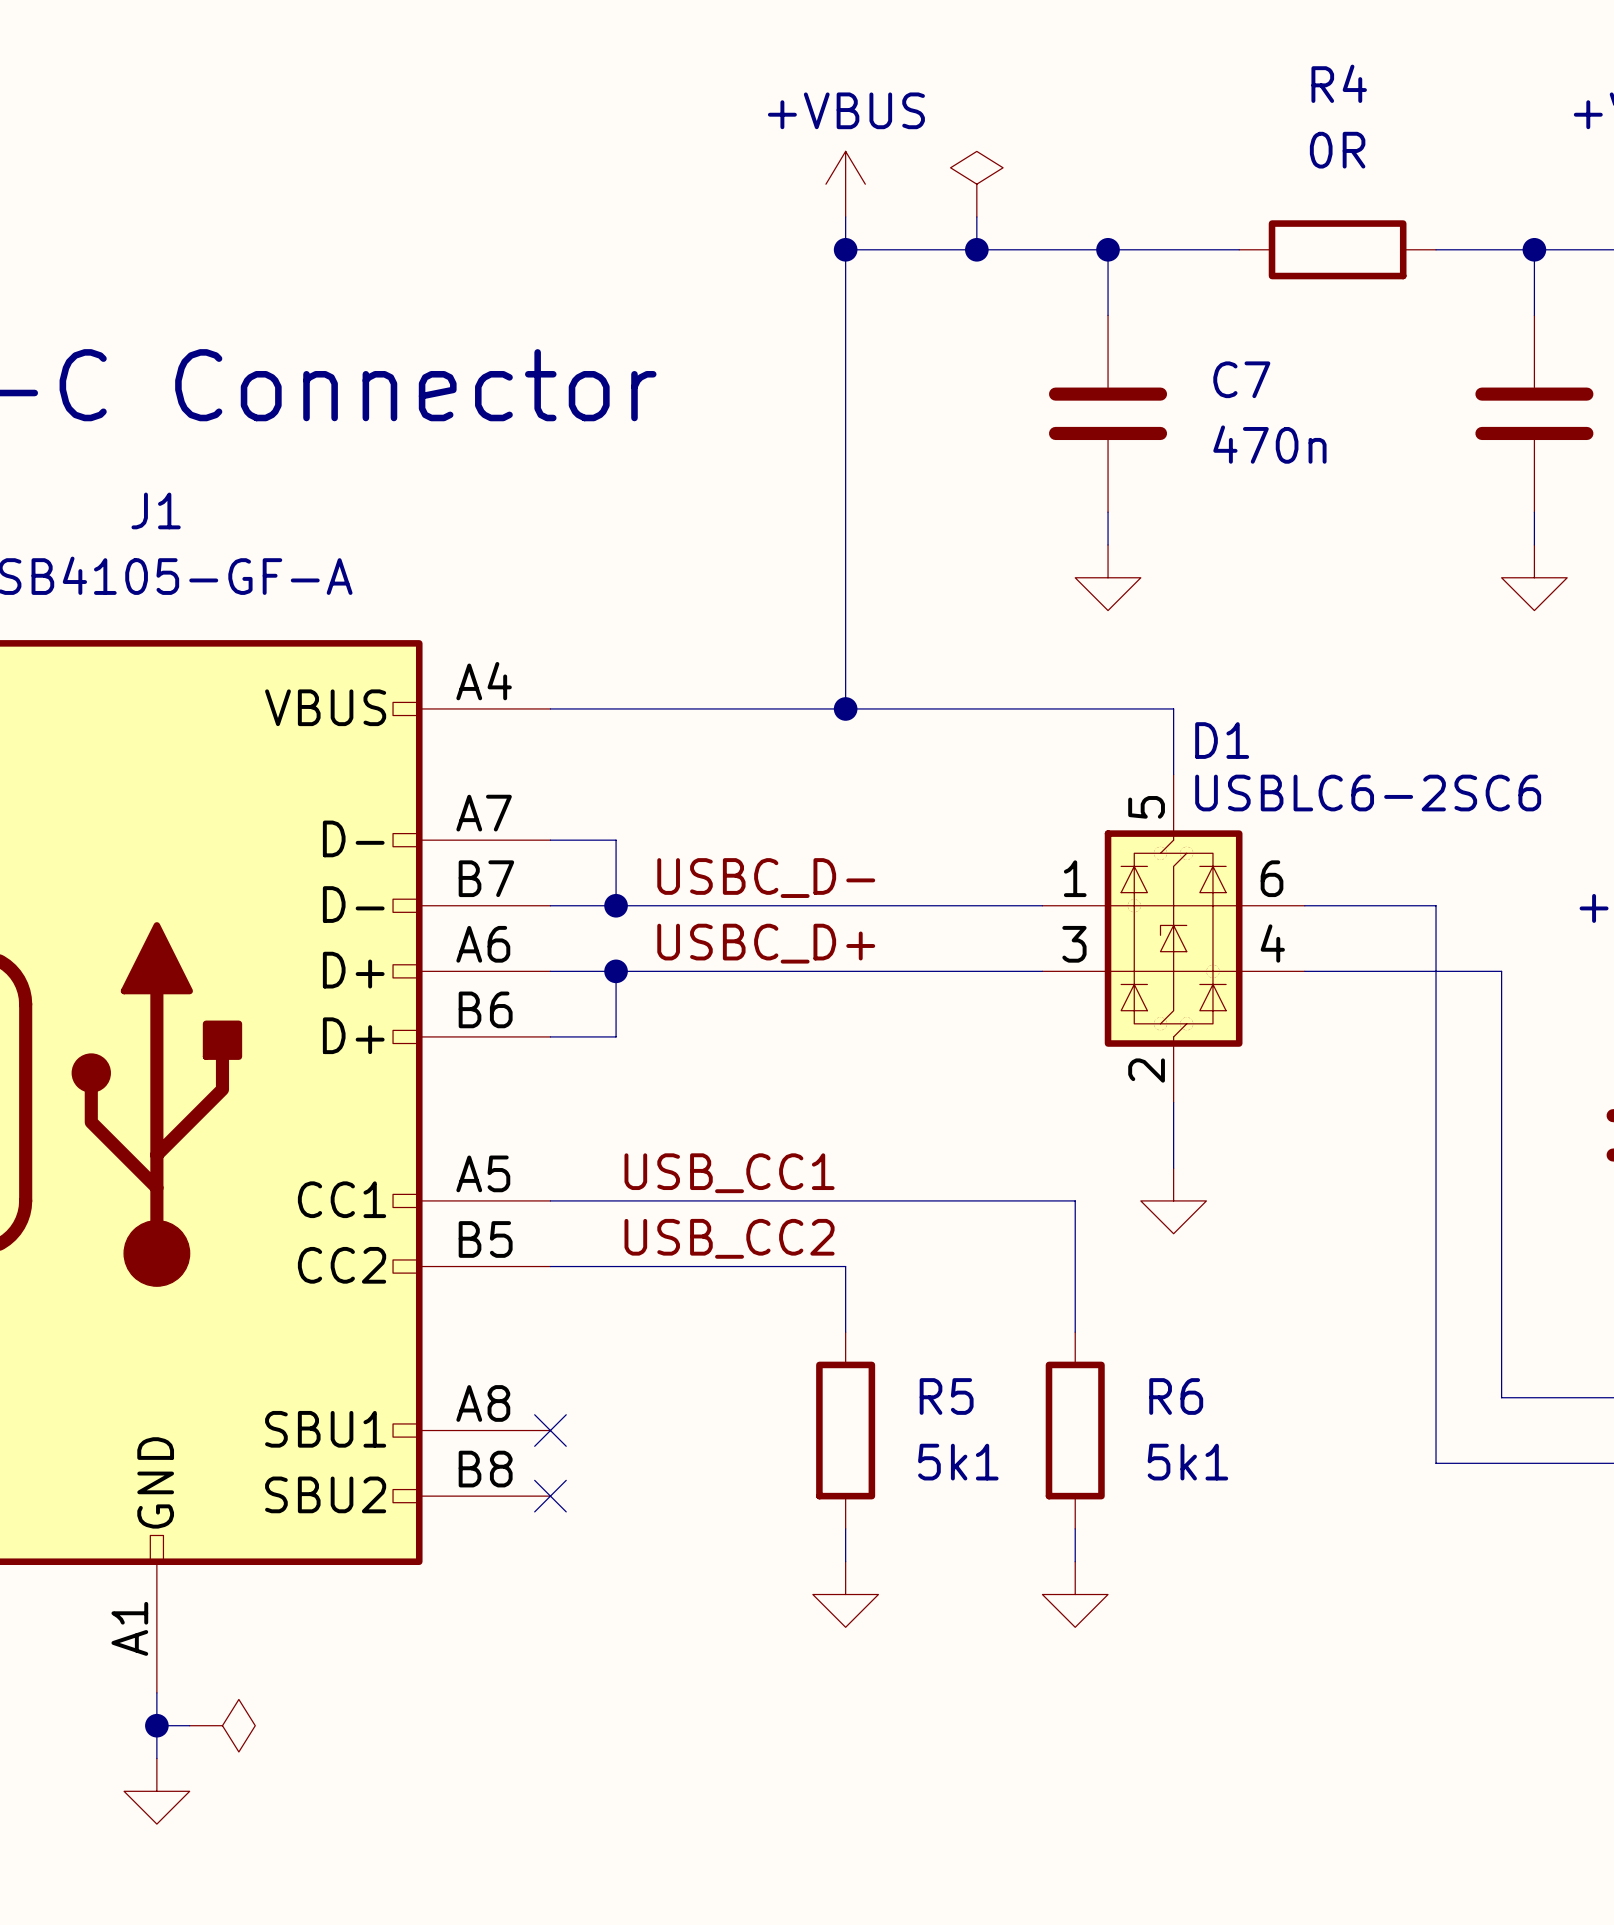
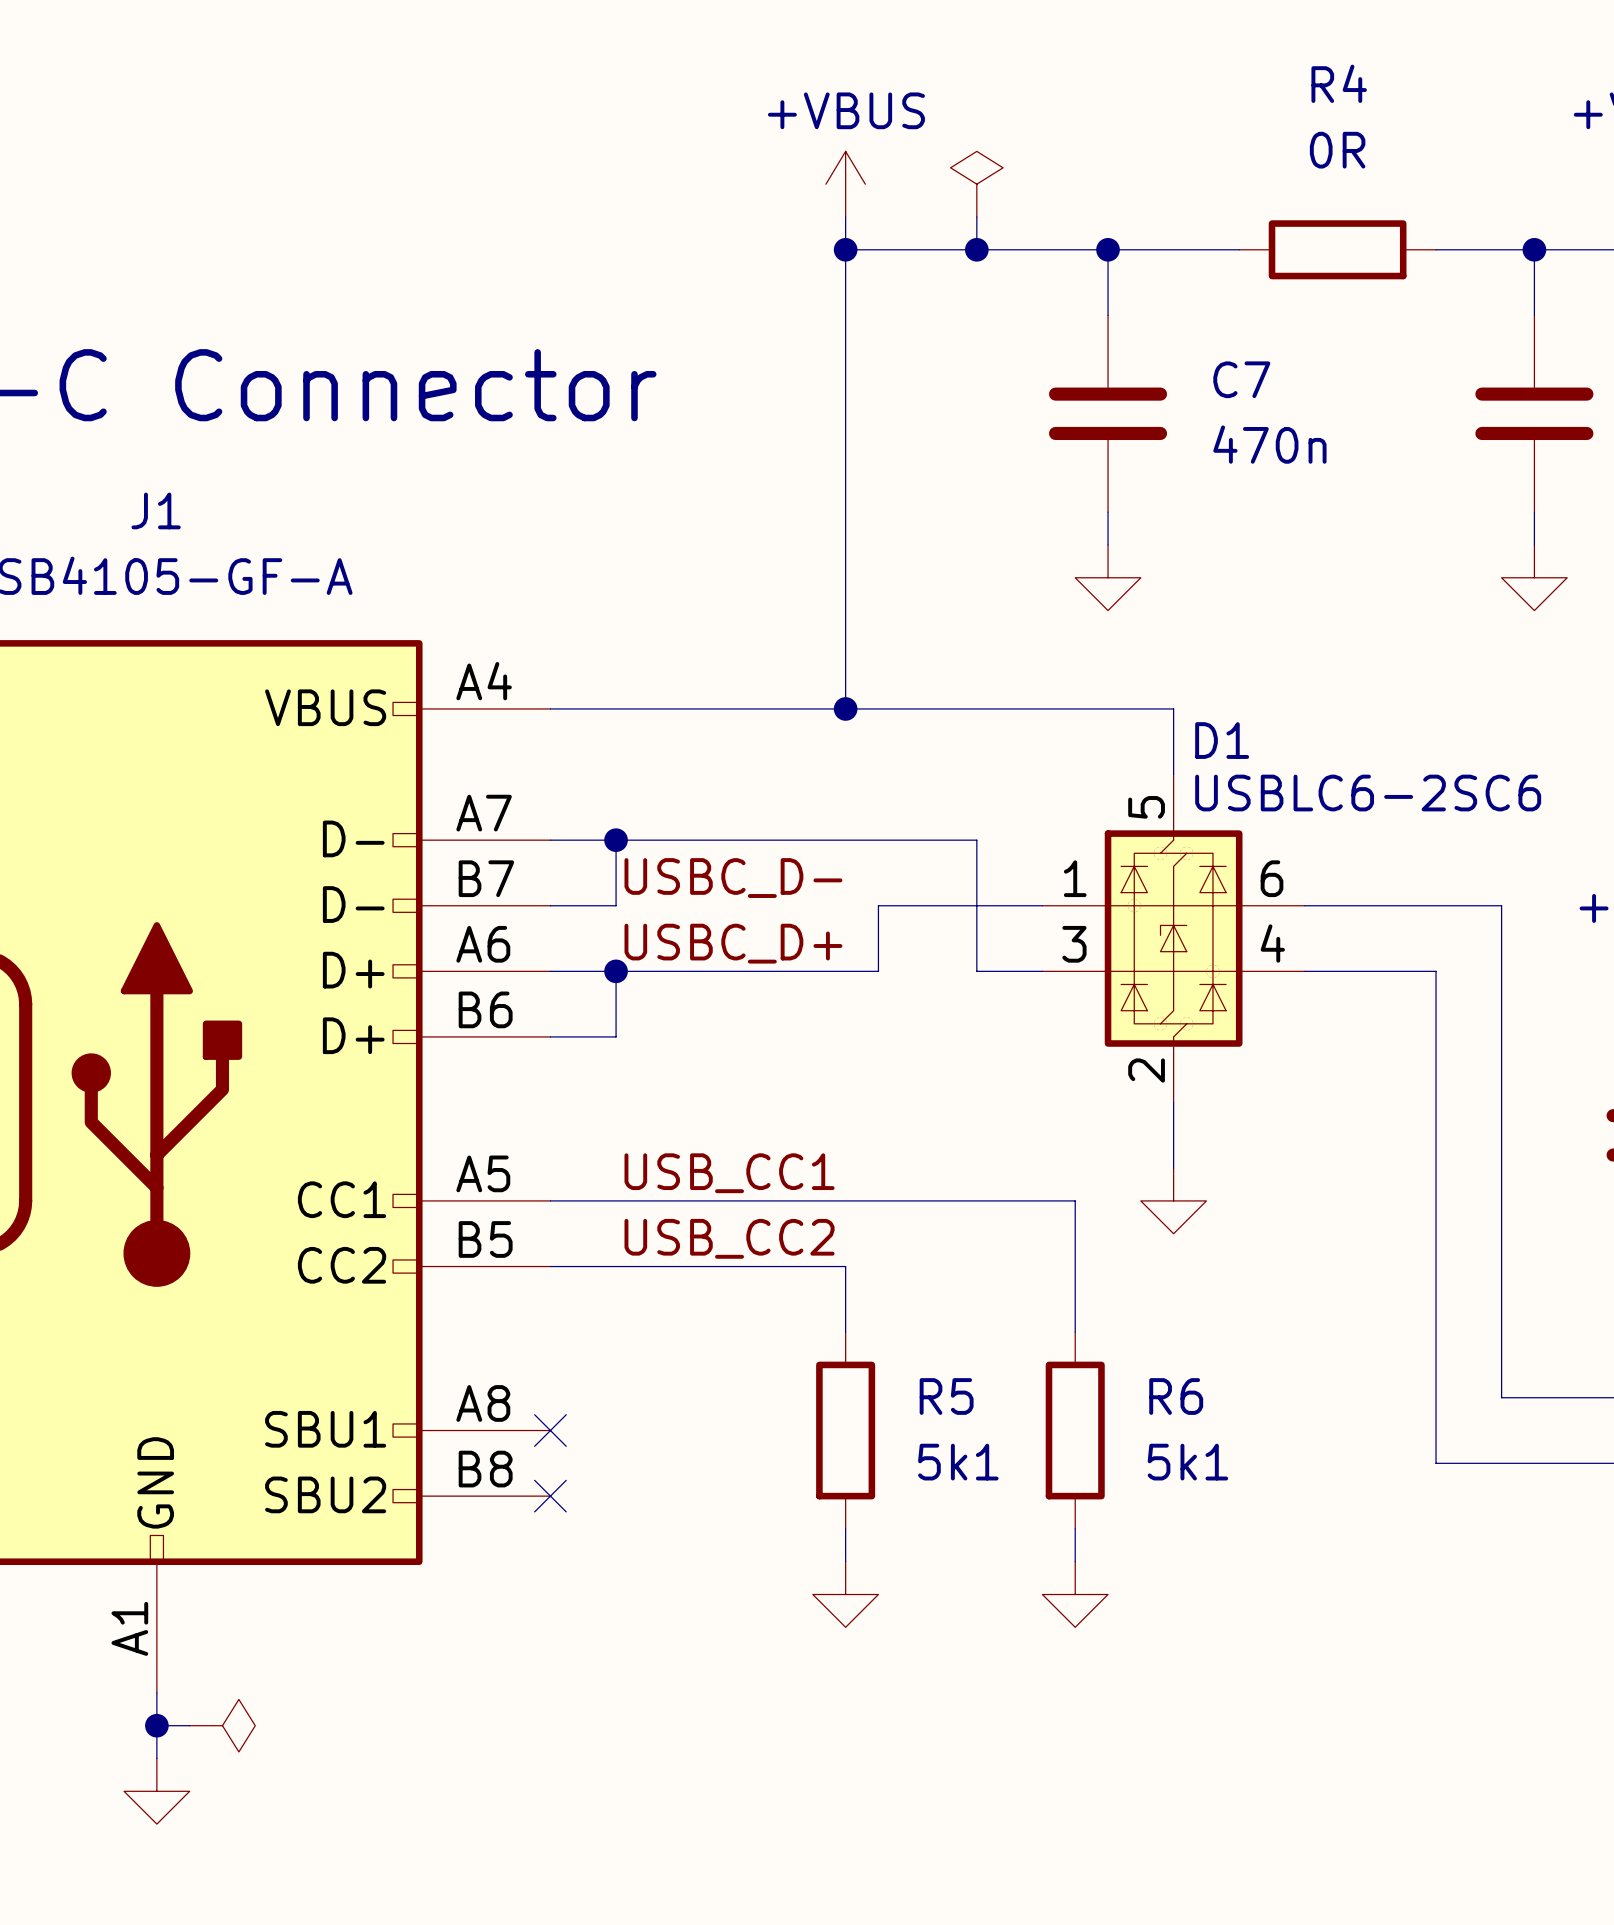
wire: none -> (616, 840) (976, 840) (976, 971)
label position: USBC_D- (766, 878) -> USBC_D- (733, 878)
wire: (616, 905) (878, 905) -> none
junction position: (616, 905) -> (616, 840)
wire: (1436, 905) (1436, 971) (1501, 971) -> (1436, 905) (1501, 905) (1501, 971)
label position: USBC_D+ (766, 943) -> USBC_D+ (733, 943)
wire: (878, 971) (976, 971) -> (878, 971) (878, 905)

